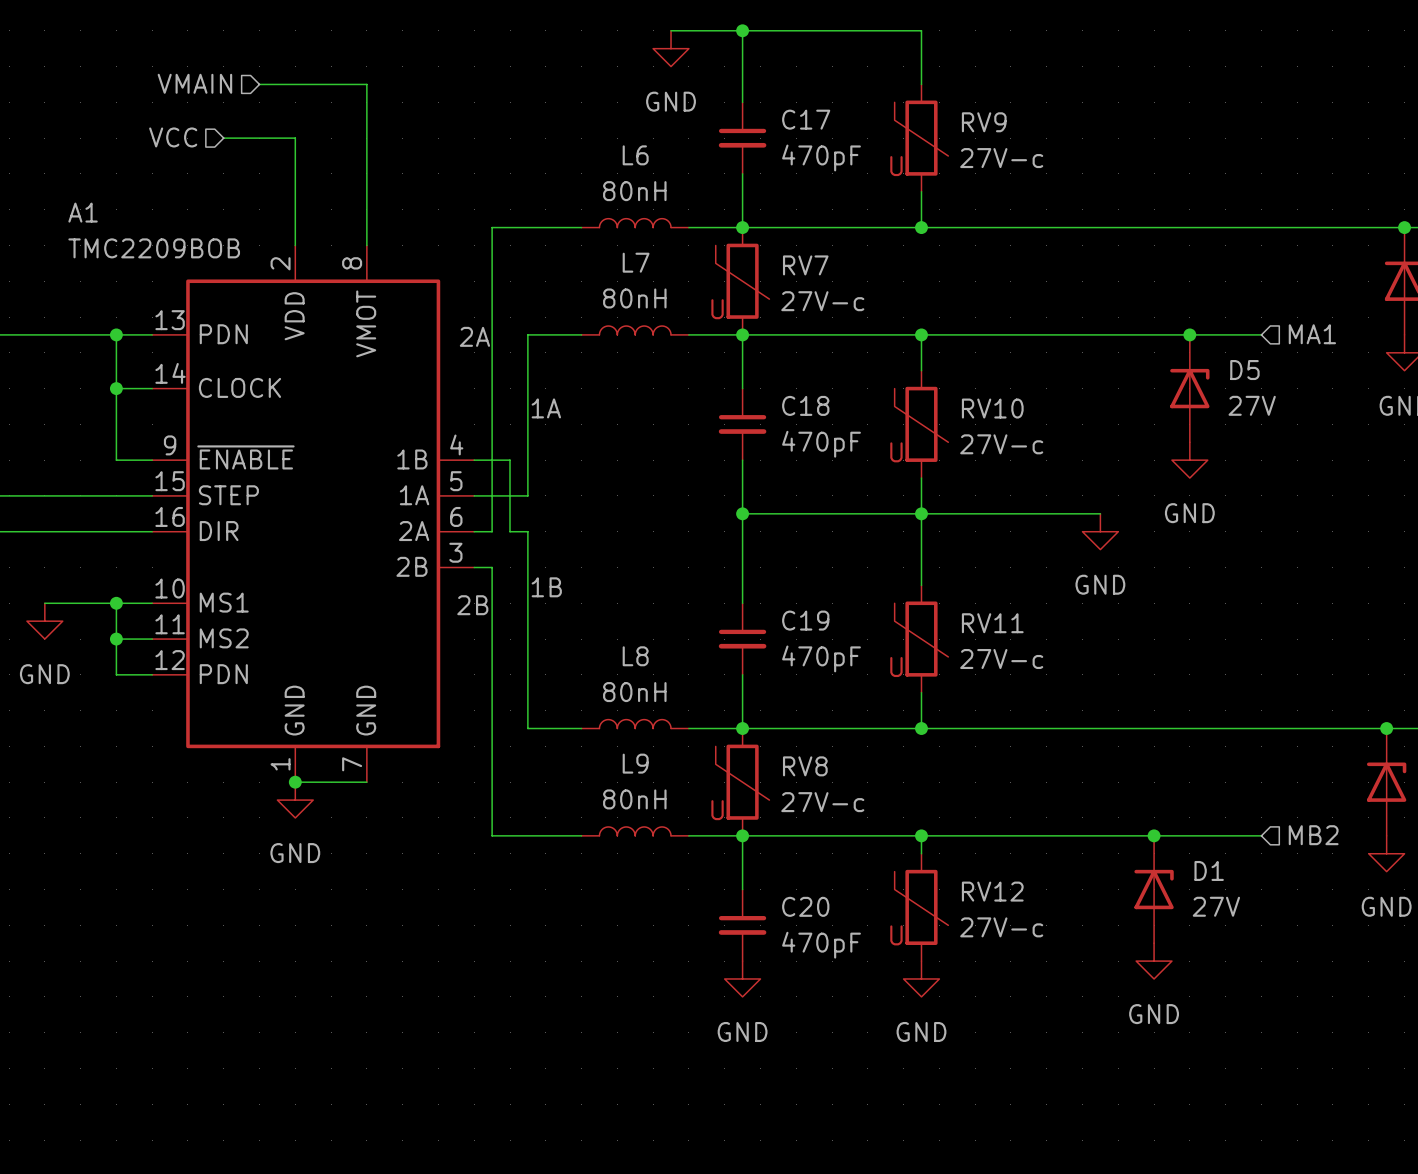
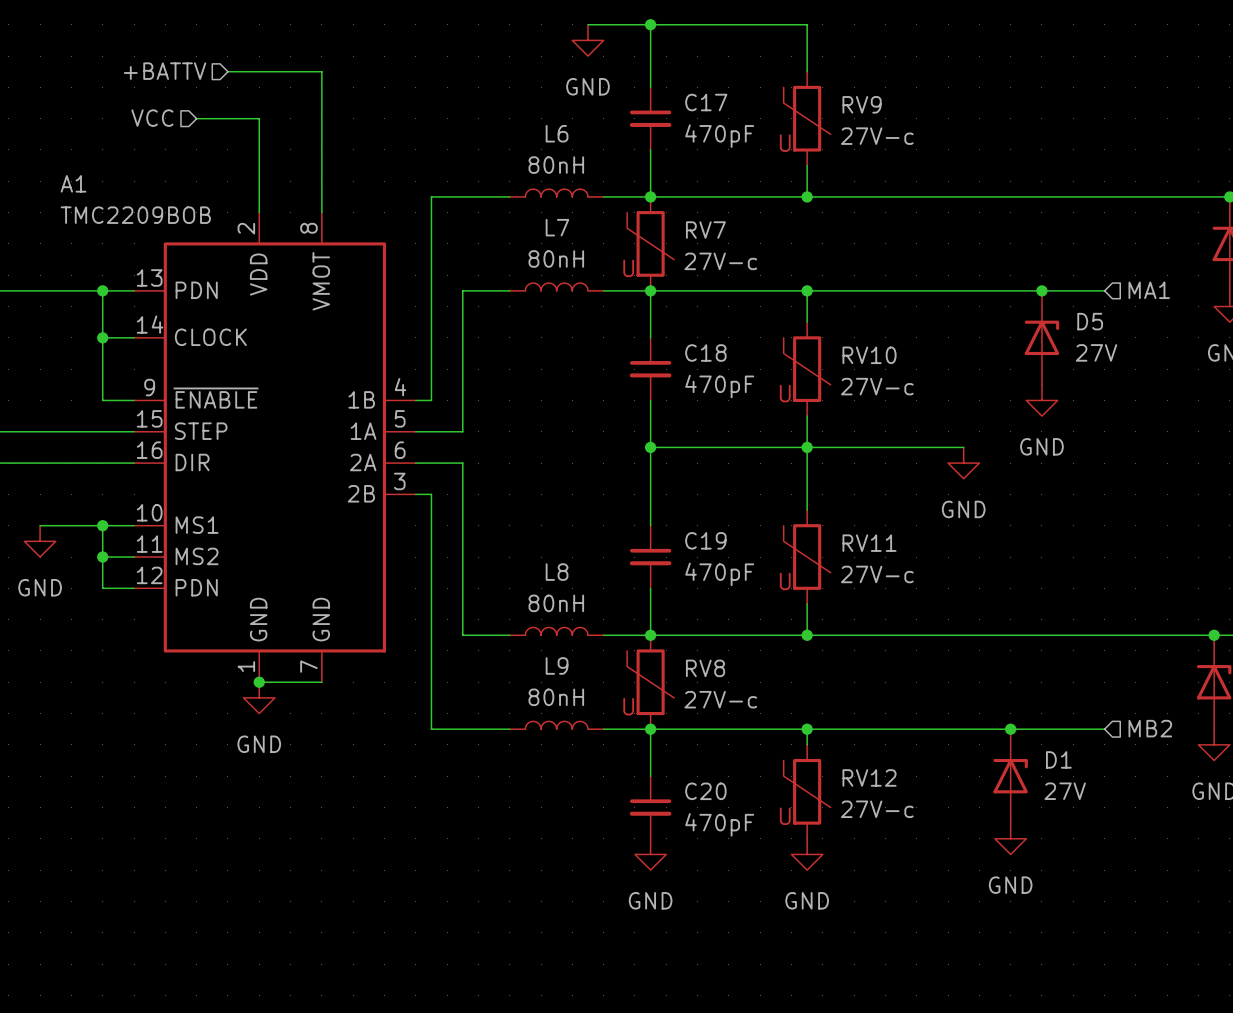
hierarchical label: VMAIN (194, 83) -> +BATTV (165, 71)
label: 2A (474, 336) -> none
label: 1A (546, 408) -> none
wire: (492, 531) (492, 460) (510, 460) (510, 531) -> (431, 463) (447, 463)
label: 1B (546, 587) -> none
label: 2B (472, 605) -> none

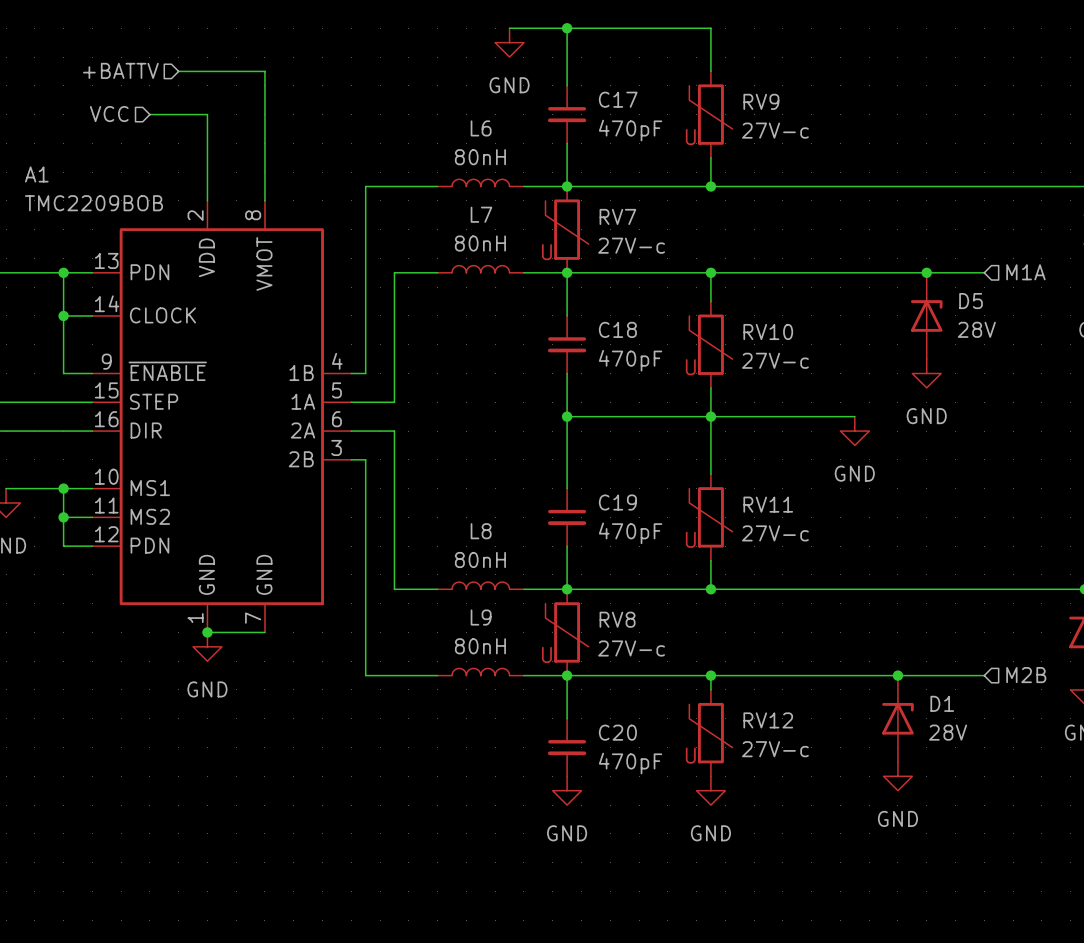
hierarchical label: MA1 (1149, 290) -> M1A (1025, 272)
D5 value: 27V (1096, 352) -> 28V (976, 329)
hierarchical label: MB2 (1150, 728) -> M2B (1026, 675)
D1 value: 27V (1065, 791) -> 28V (948, 732)

